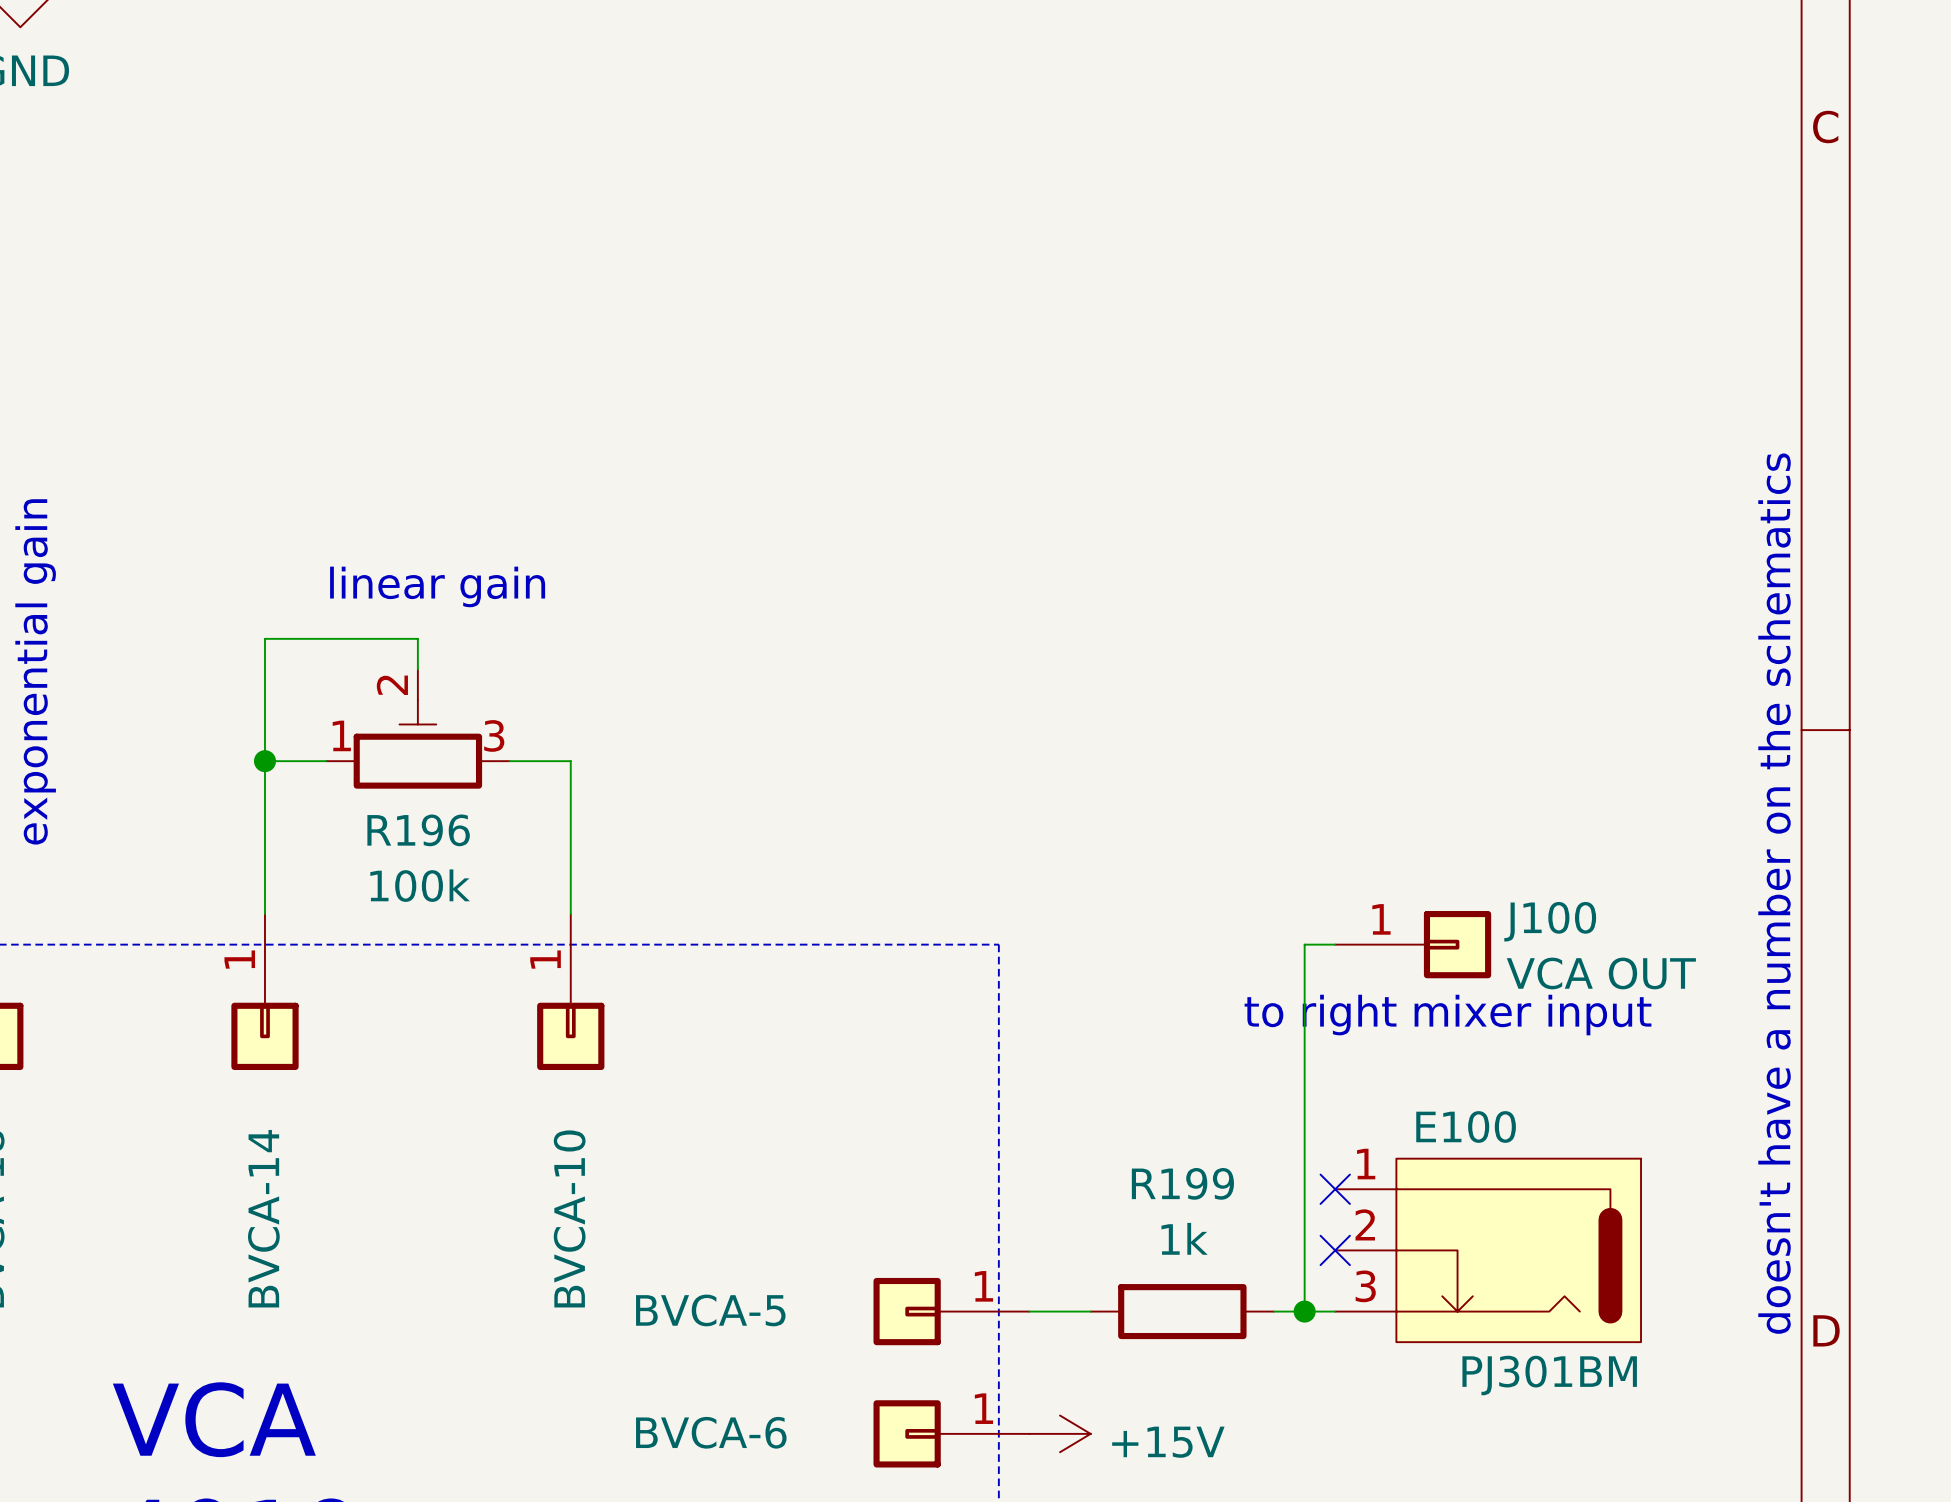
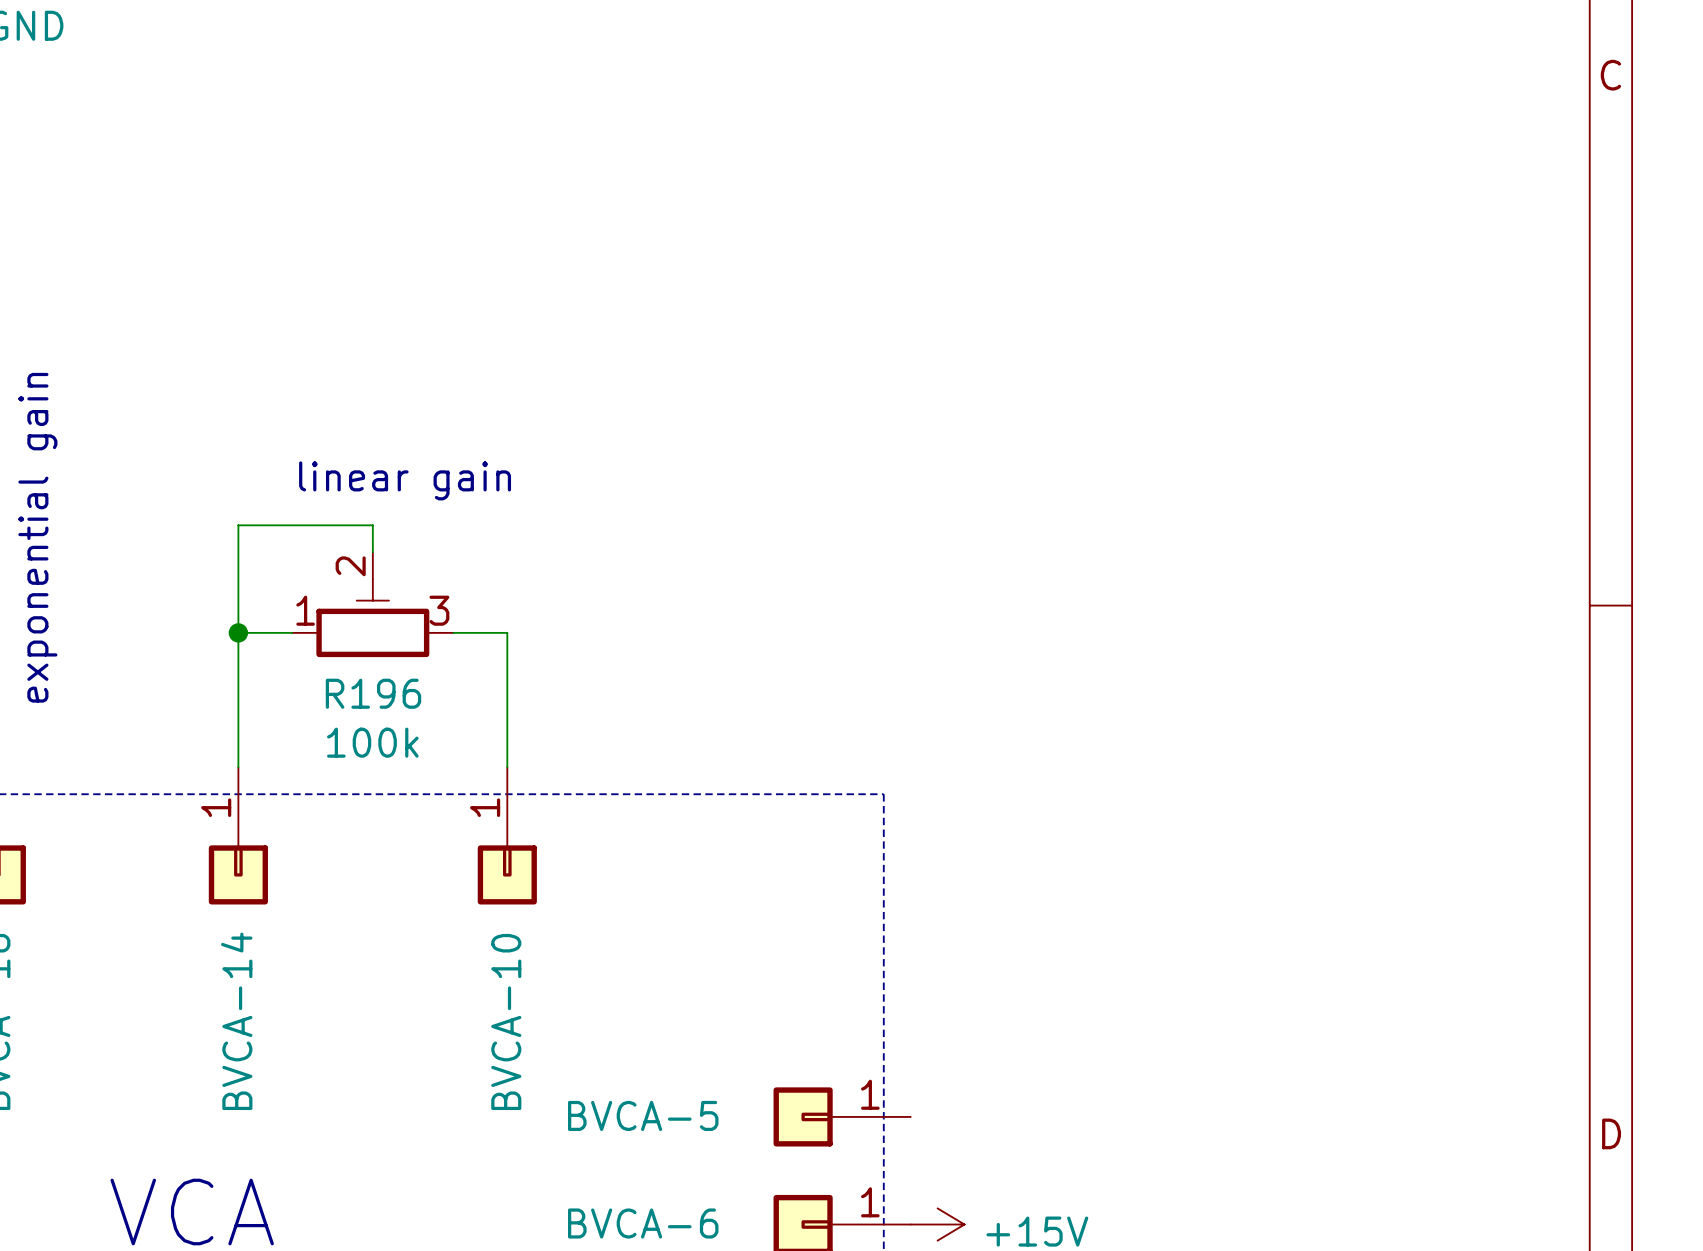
text: doesn't have a number on the schematics (1774, 893) -> none
wire: (1335, 944) (1304, 944) (1304, 1311) -> none
J100: VCA OUT (1413, 944) -> none
text: to right mixer input (1448, 1015) -> none
no-connect mark: (1335, 1189) -> none
no-connect mark: (1335, 1250) -> none
E100: PJ301BM (1488, 1250) -> none
wire: (1029, 1311) (1090, 1311) -> none
R199: 1k (1182, 1311) -> none
wire: (1274, 1311) (1335, 1311) -> none
junction: (1304, 1311) -> none

